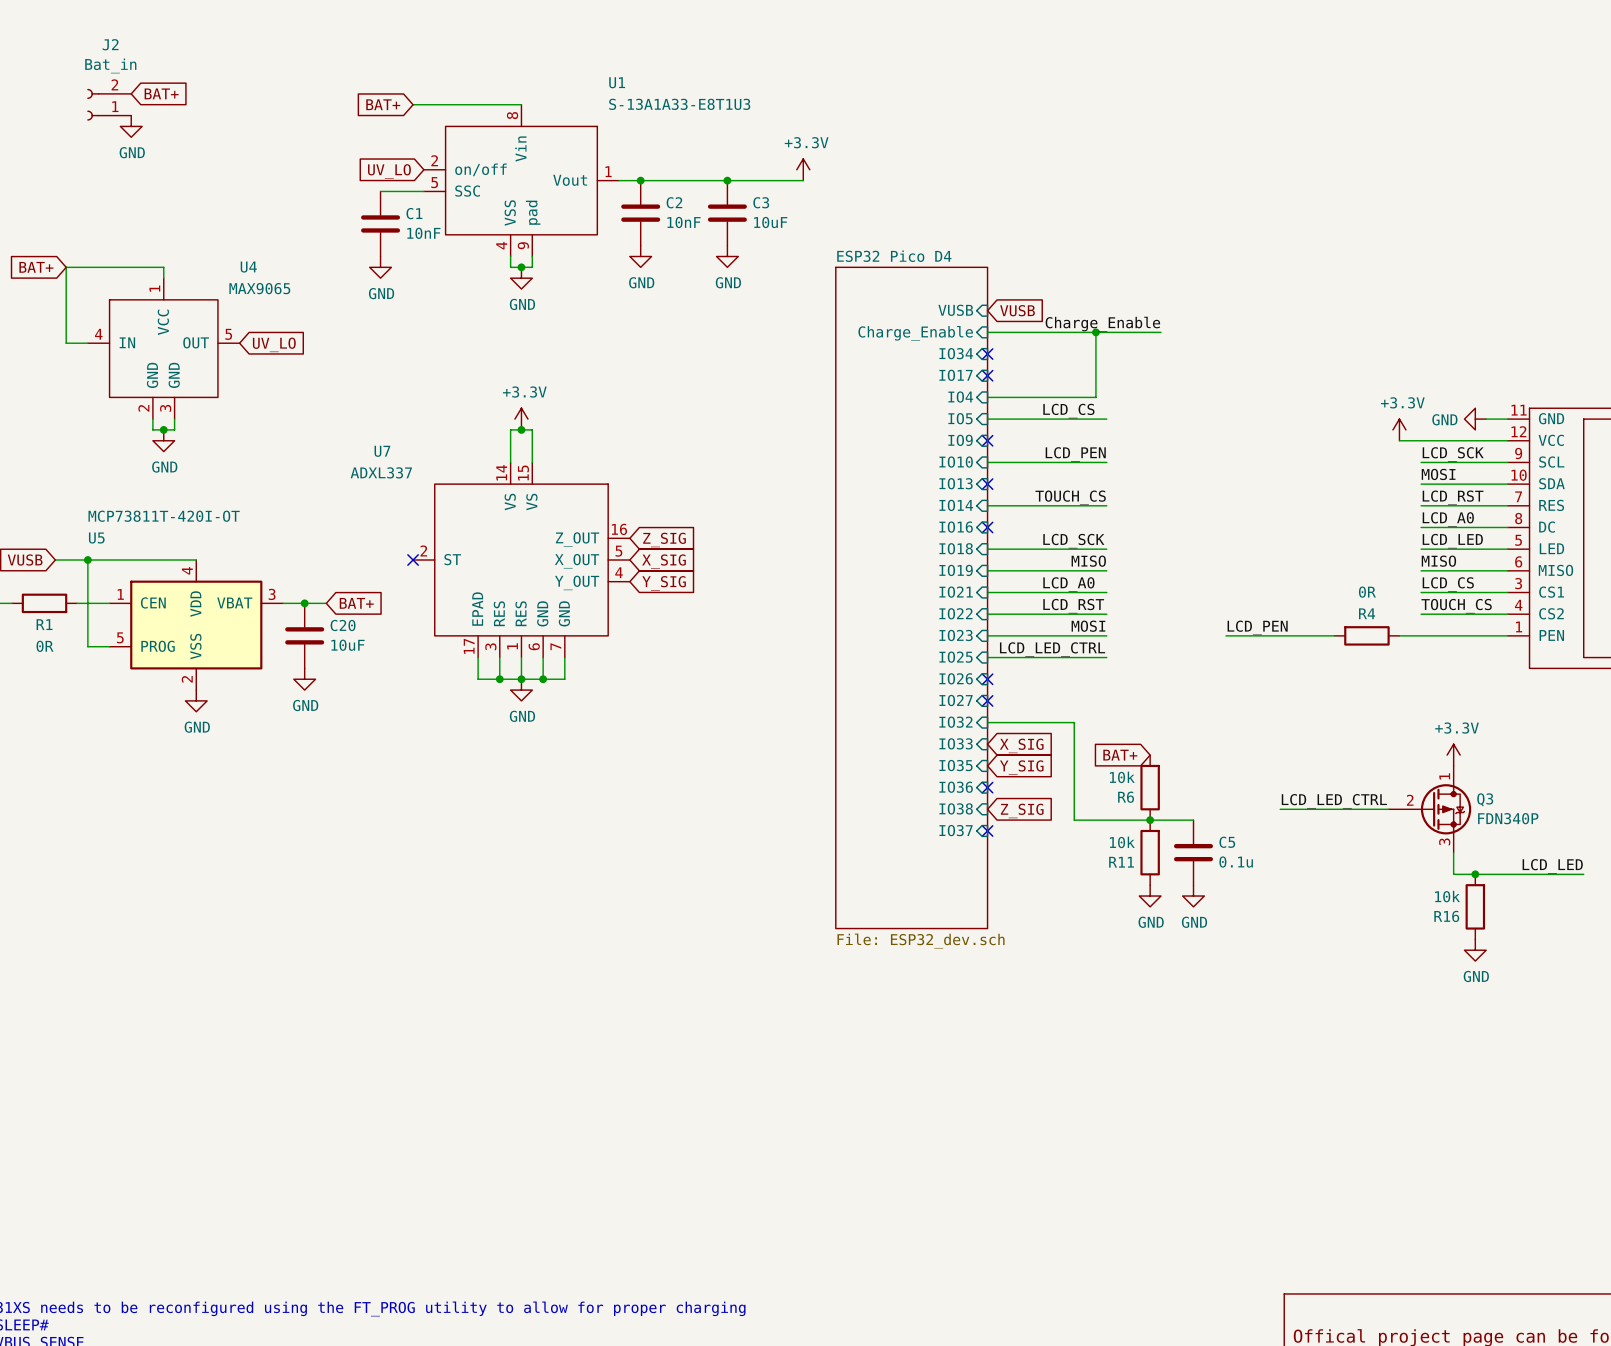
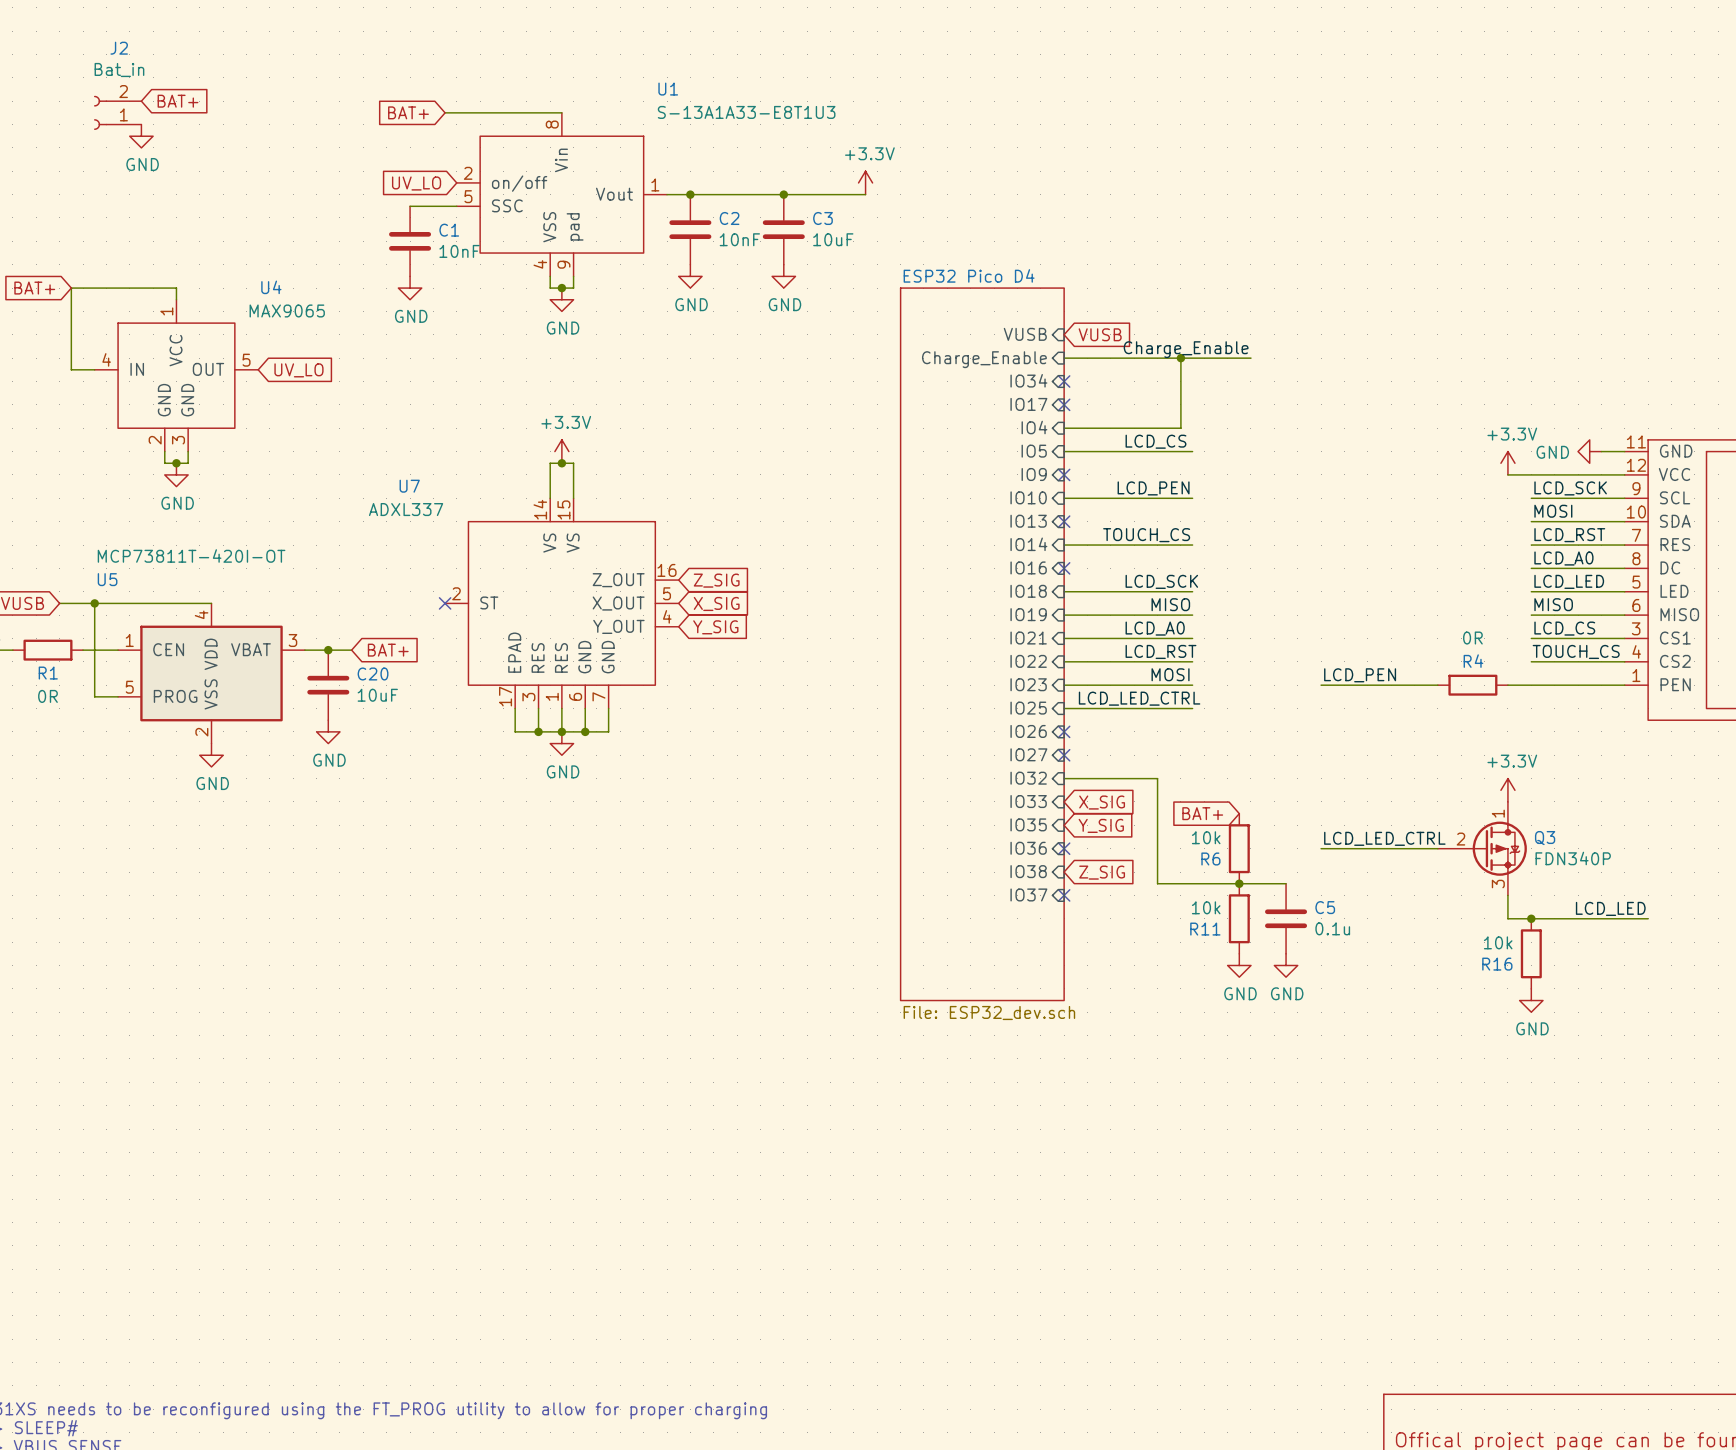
power symbol position: +3.3V (1453, 755) -> +3.3V (1507, 790)
label position: LCD_LED_CTRL (1334, 801) -> LCD_LED_CTRL (1384, 838)
wire: (1280, 809) (1388, 809) -> (1321, 848) (1437, 848)
Q3 position: (1429, 809) -> (1482, 848)
junction: none -> (1531, 918)
wire: (1453, 852) (1453, 874) (1583, 874) -> (1507, 895) (1507, 918) (1648, 918)
label position: LCD_LED (1552, 866) -> LCD_LED (1610, 908)
junction: (1475, 874) -> none
R16 position: (1475, 906) -> (1531, 953)
power symbol position: GND (1475, 950) -> GND (1531, 1000)

